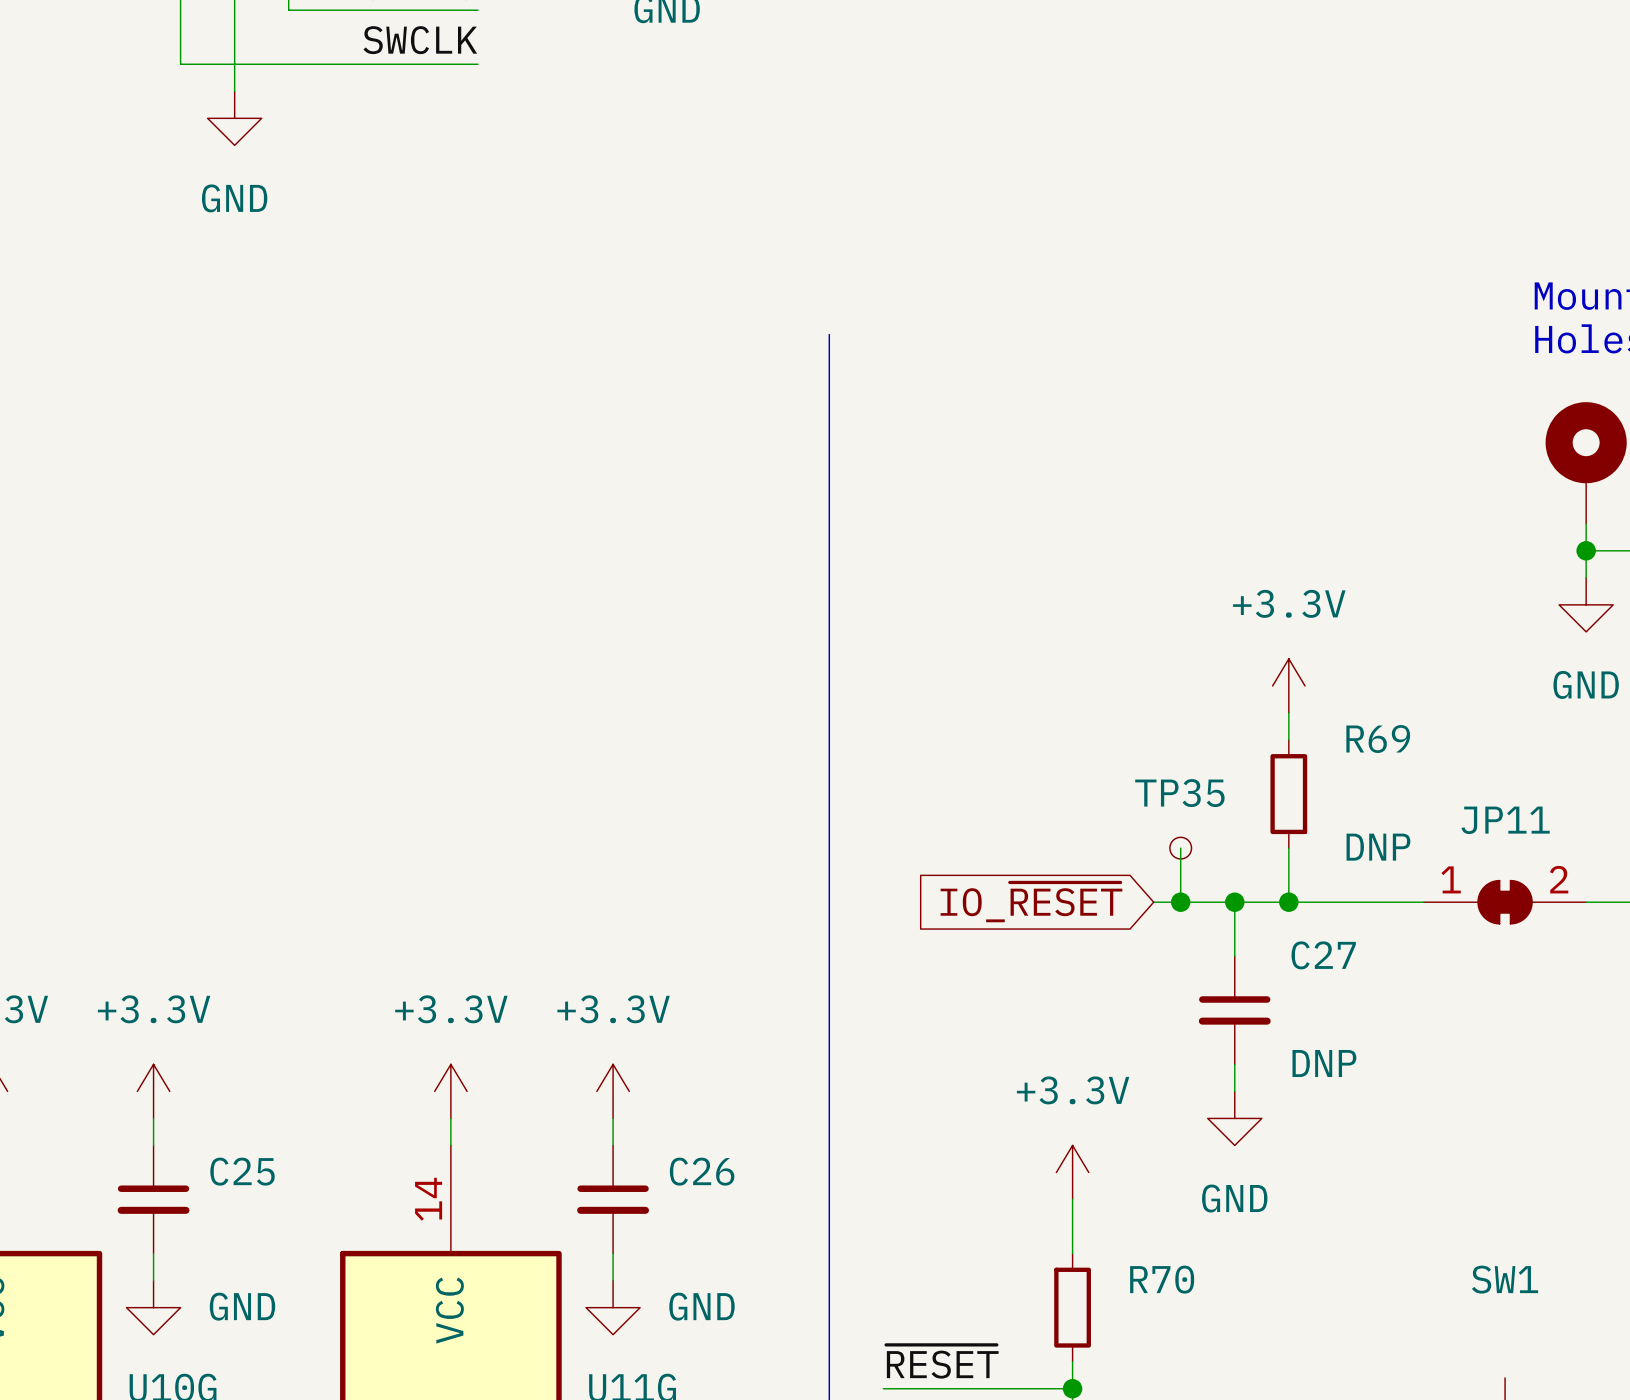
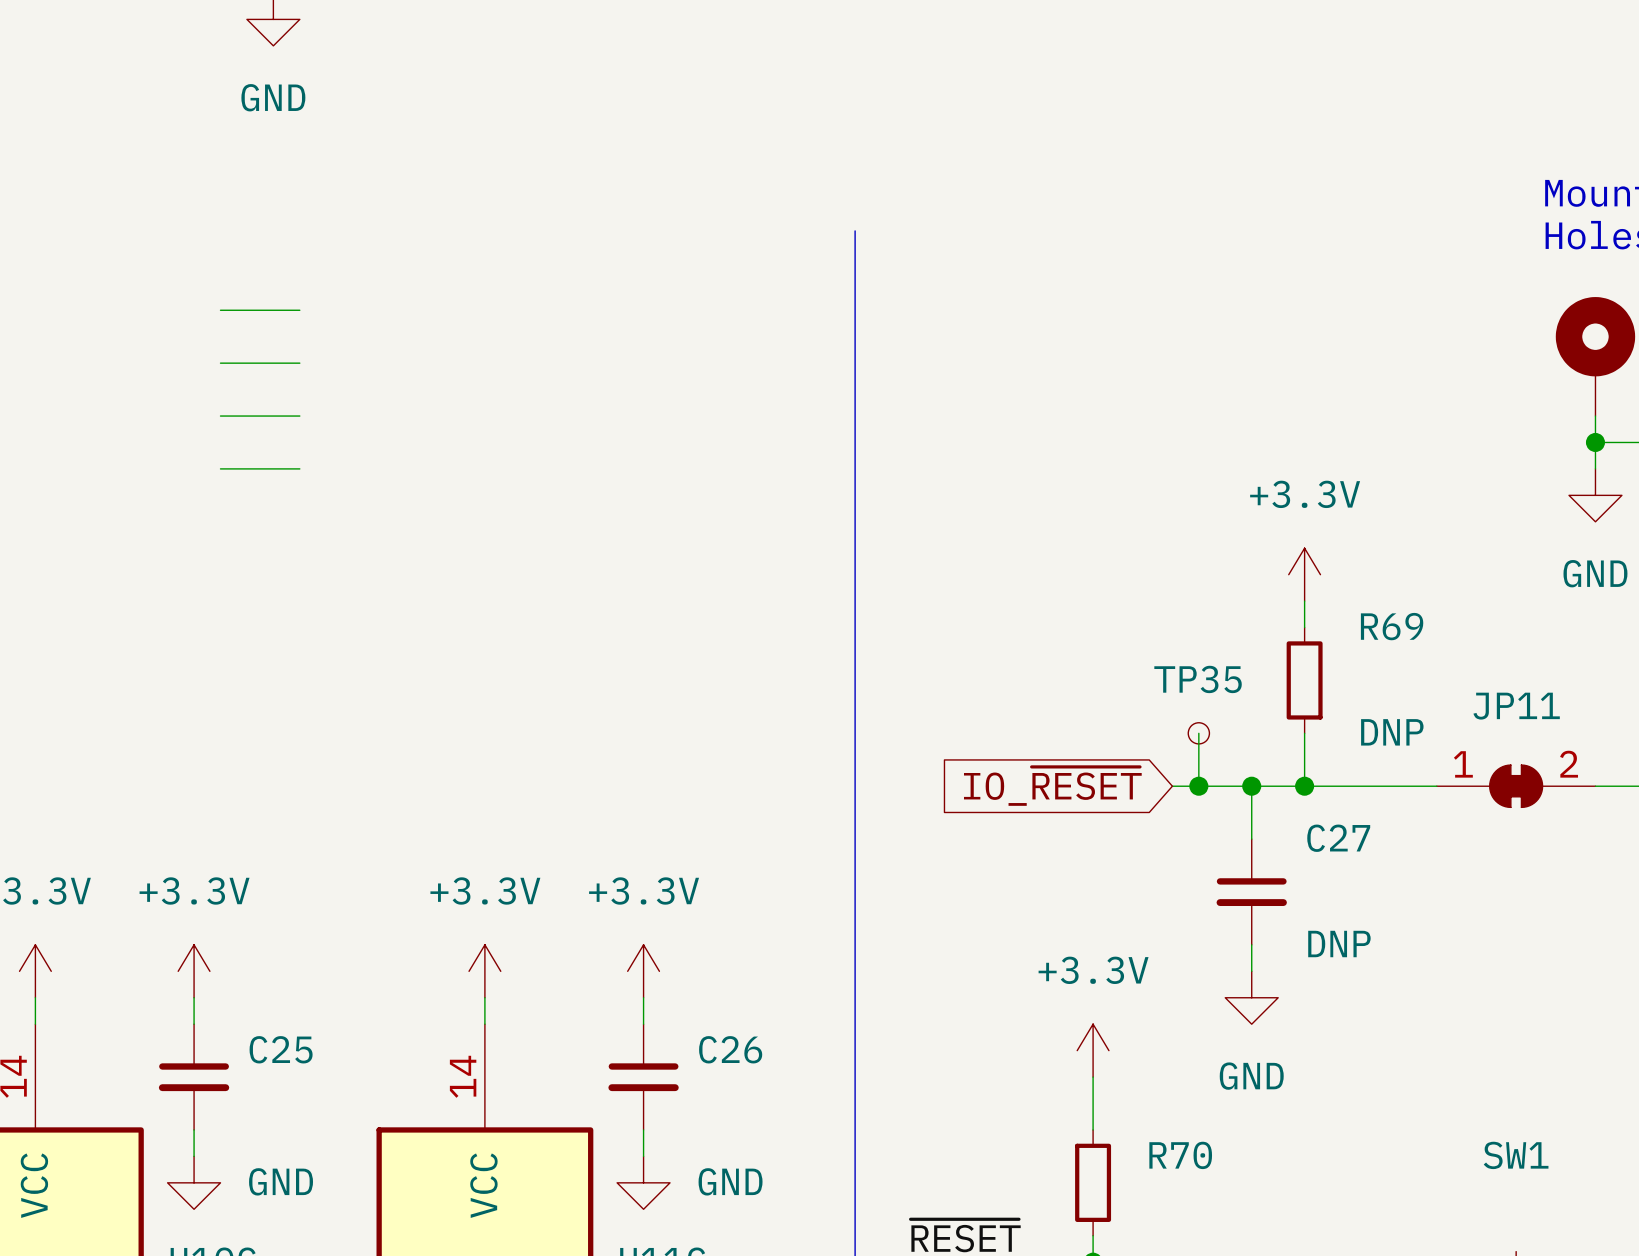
wire: none -> (220, 310) (299, 310)
wire: none -> (220, 363) (299, 363)
wire: none -> (220, 416) (299, 416)
wire: none -> (220, 468) (299, 468)

